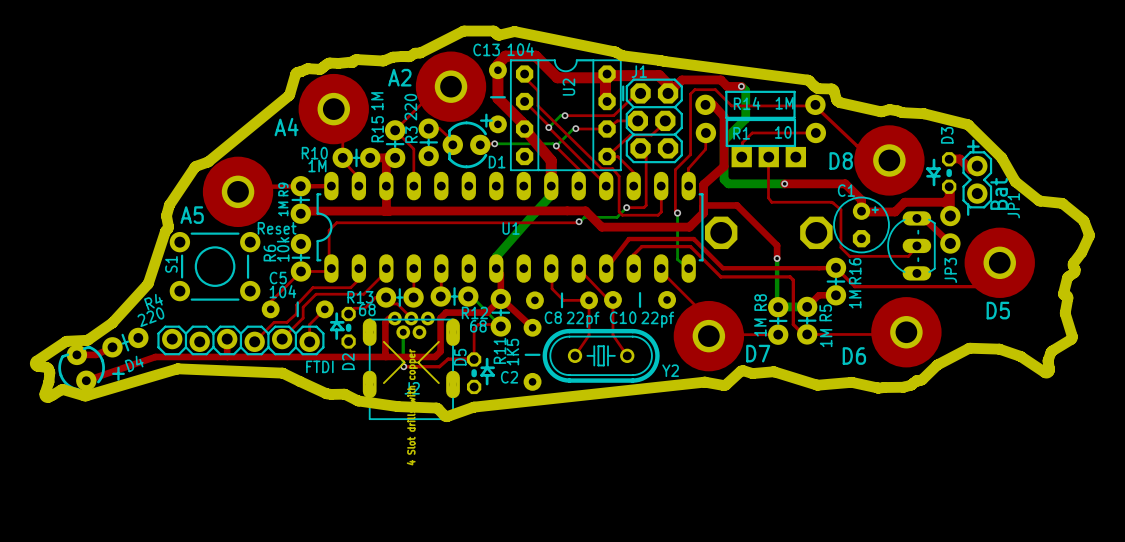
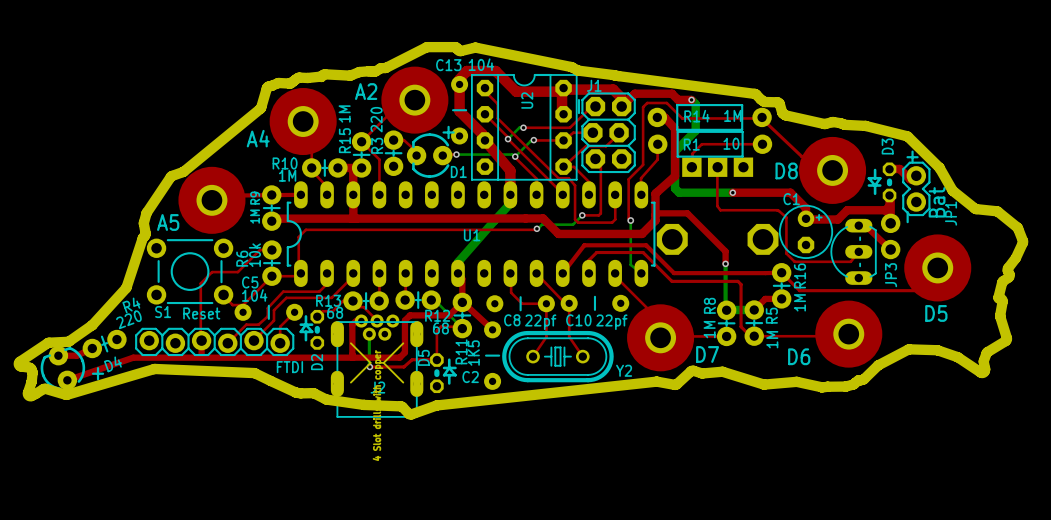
text position: Reset (277, 228) -> Reset (201, 313)
top track: none -> (271, 250) (259, 250) (237, 272) (212, 272) (200, 283) (201, 340)
S1 name rotation: 0° (171, 264) -> 90° clockwise (163, 312)
S1 name position: S1 (171, 264) -> S1 (163, 312)
top track: none -> (223, 295) (232, 305) (243, 305)

